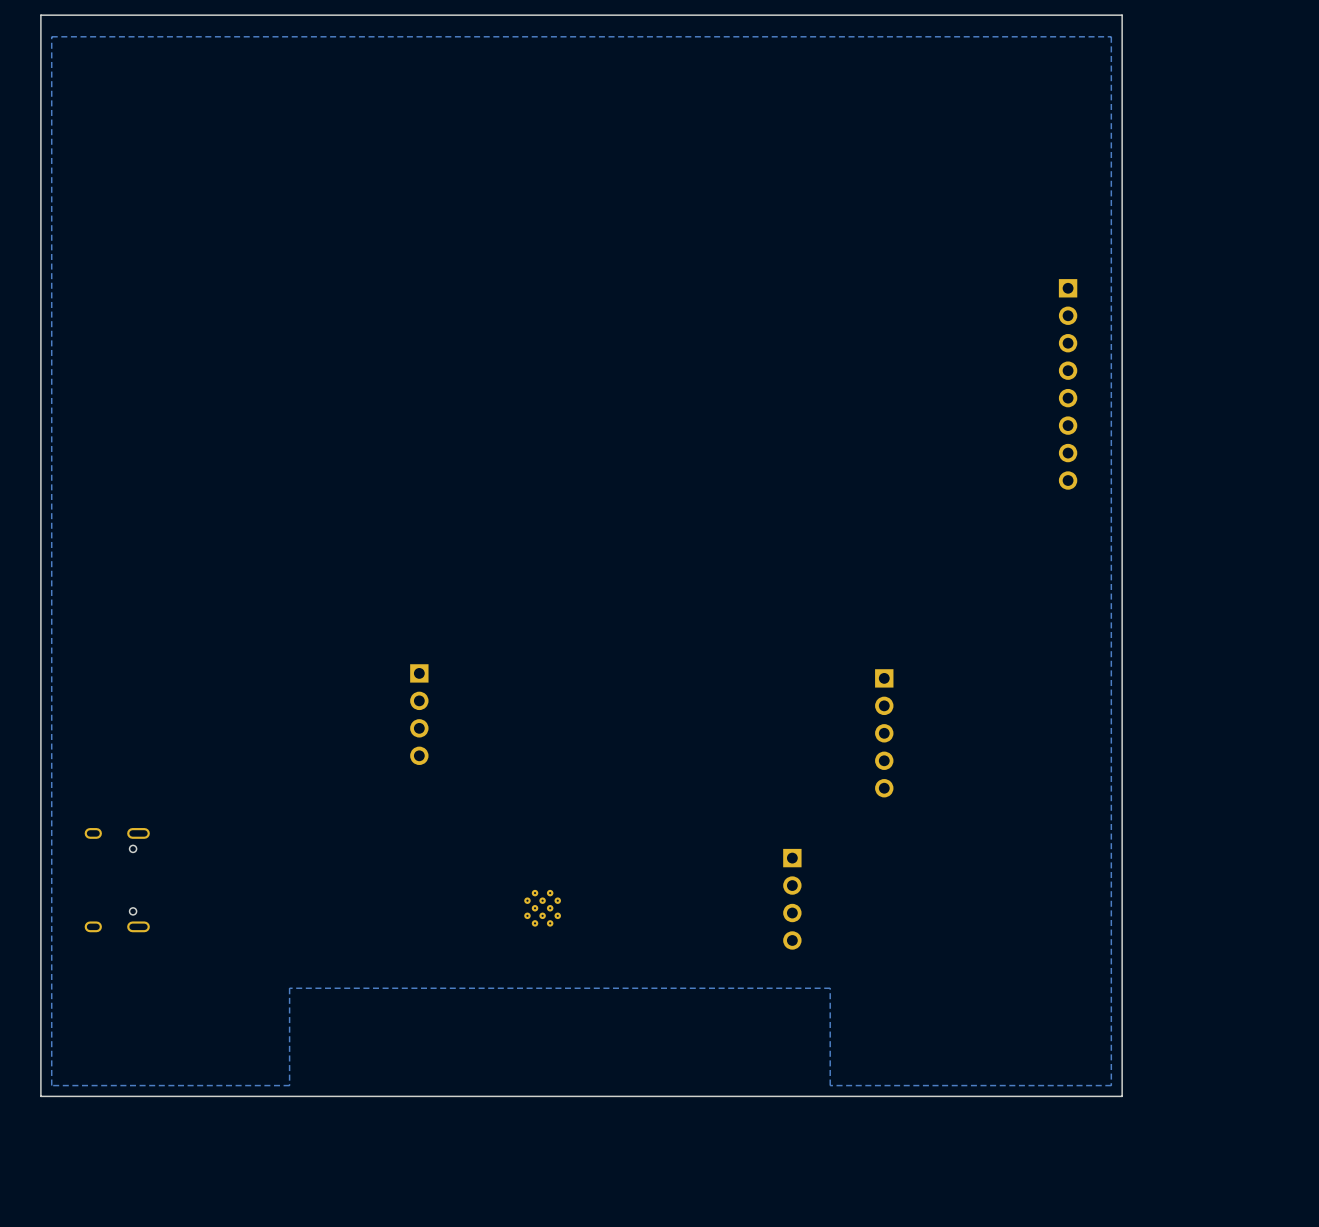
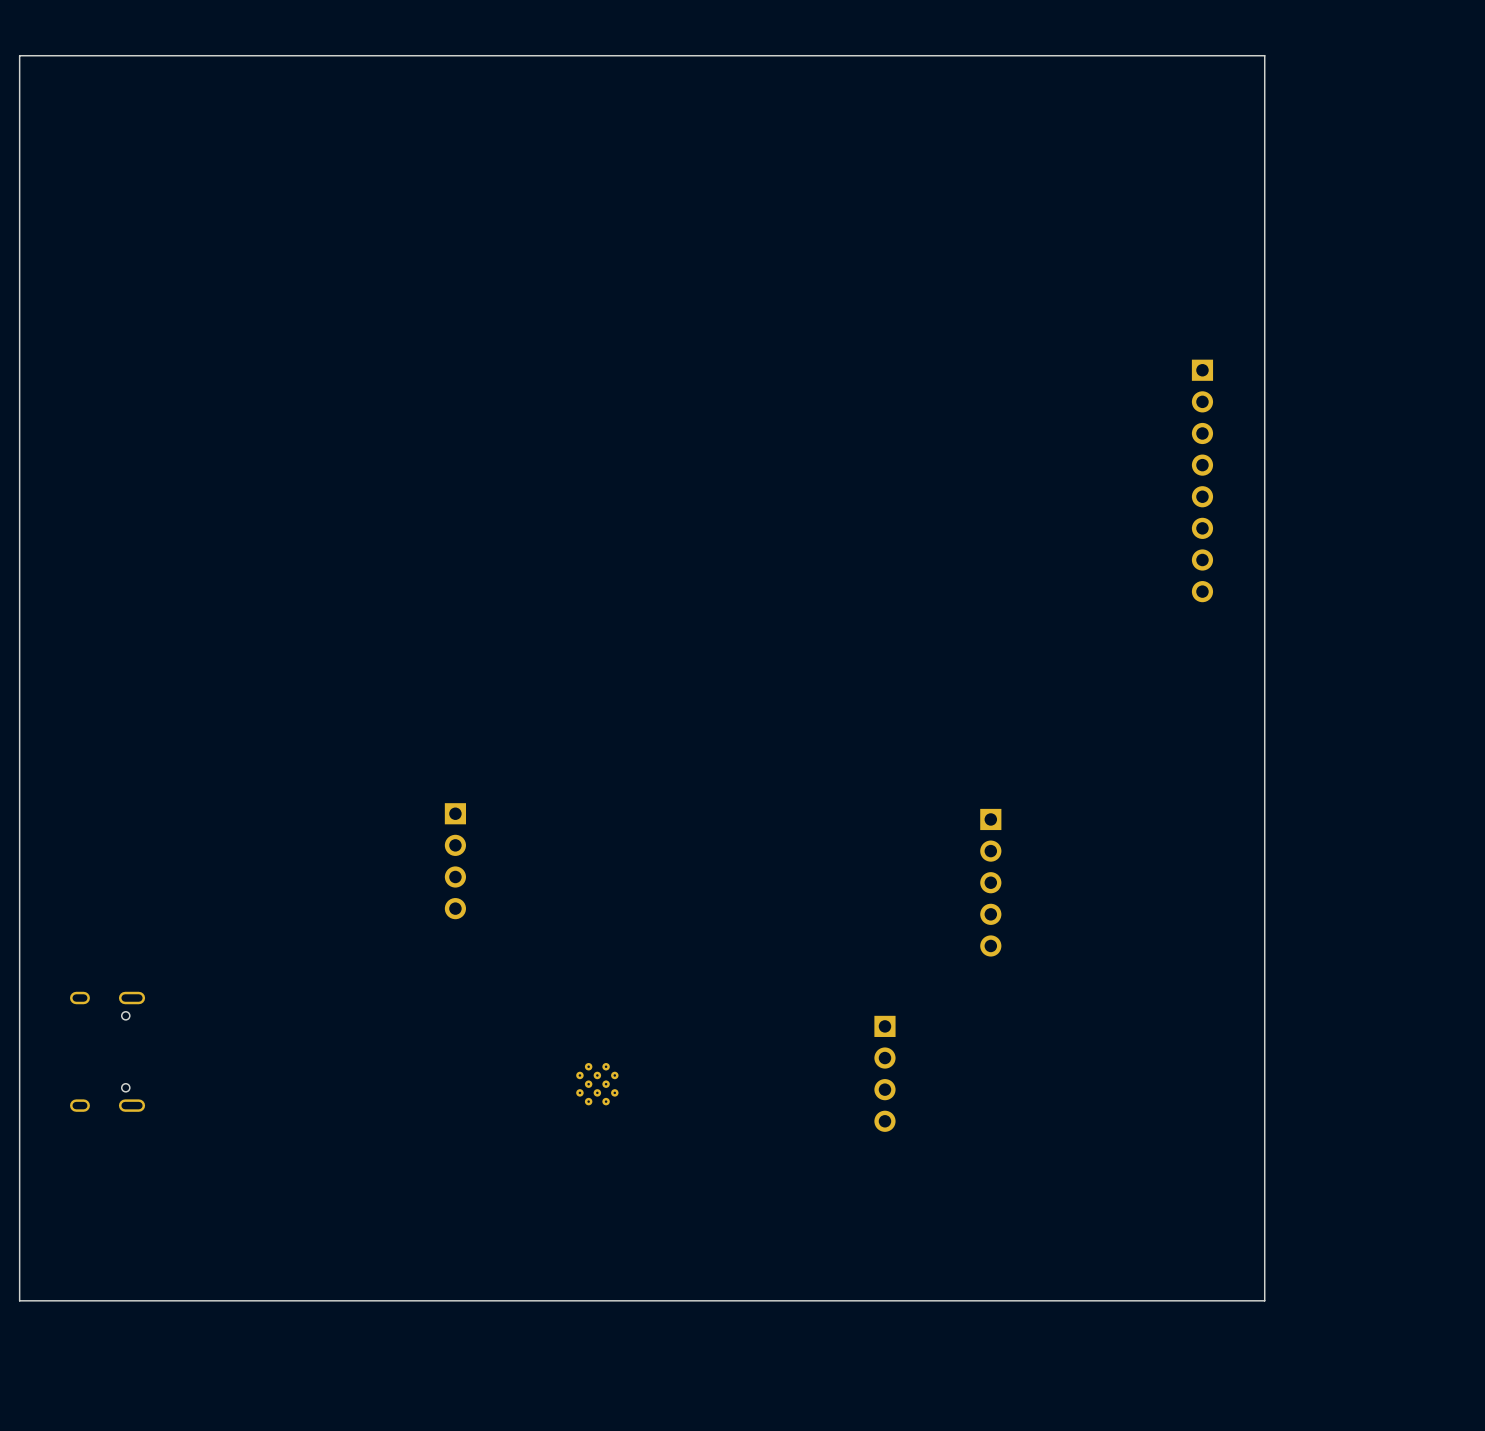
zone outline: (1111, 36) (51, 36) (51, 1085) (289, 1085) (289, 988) (830, 988) (830, 1085) (1111, 1085) (1111, 36) -> none

